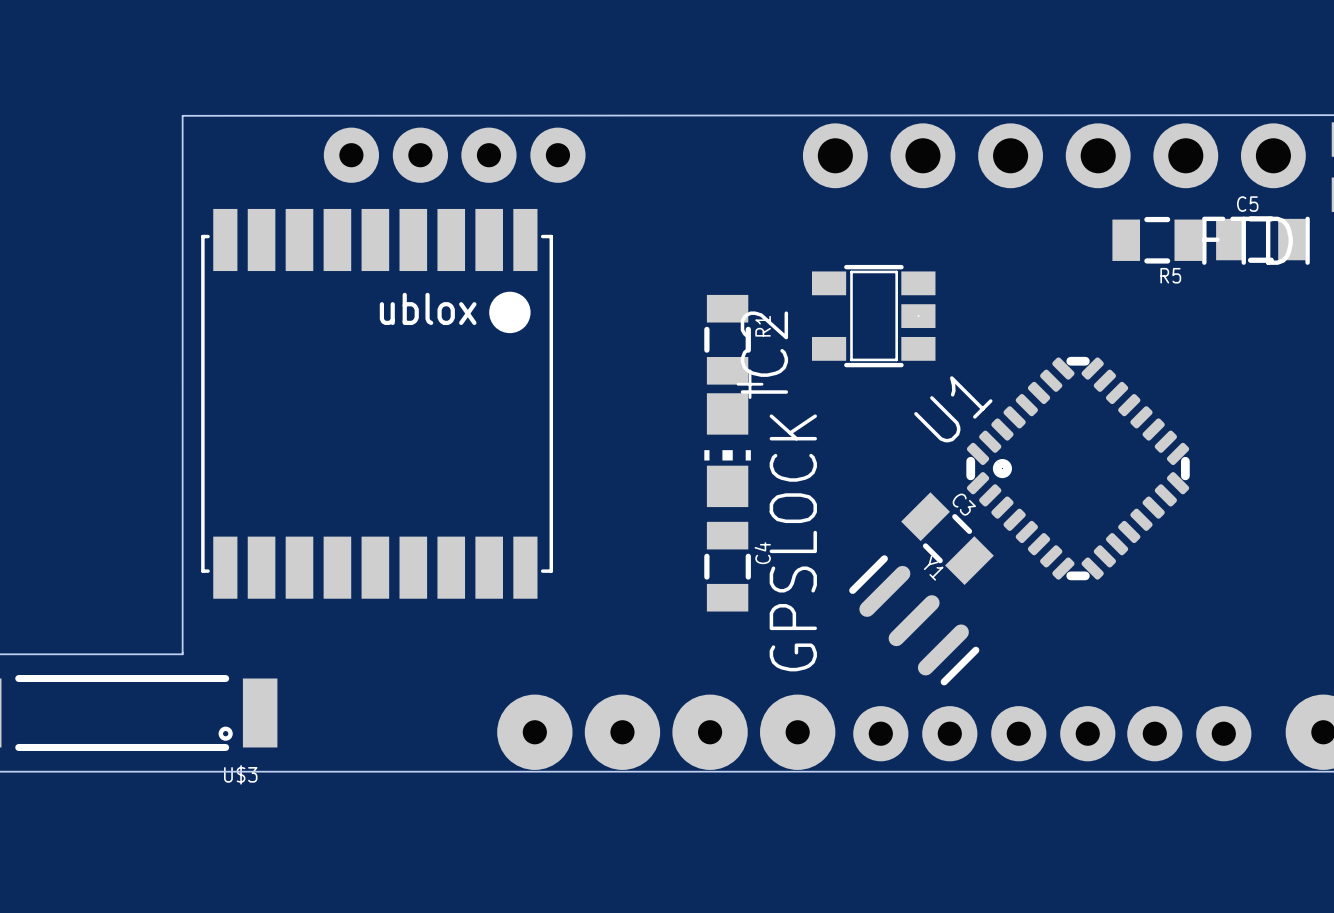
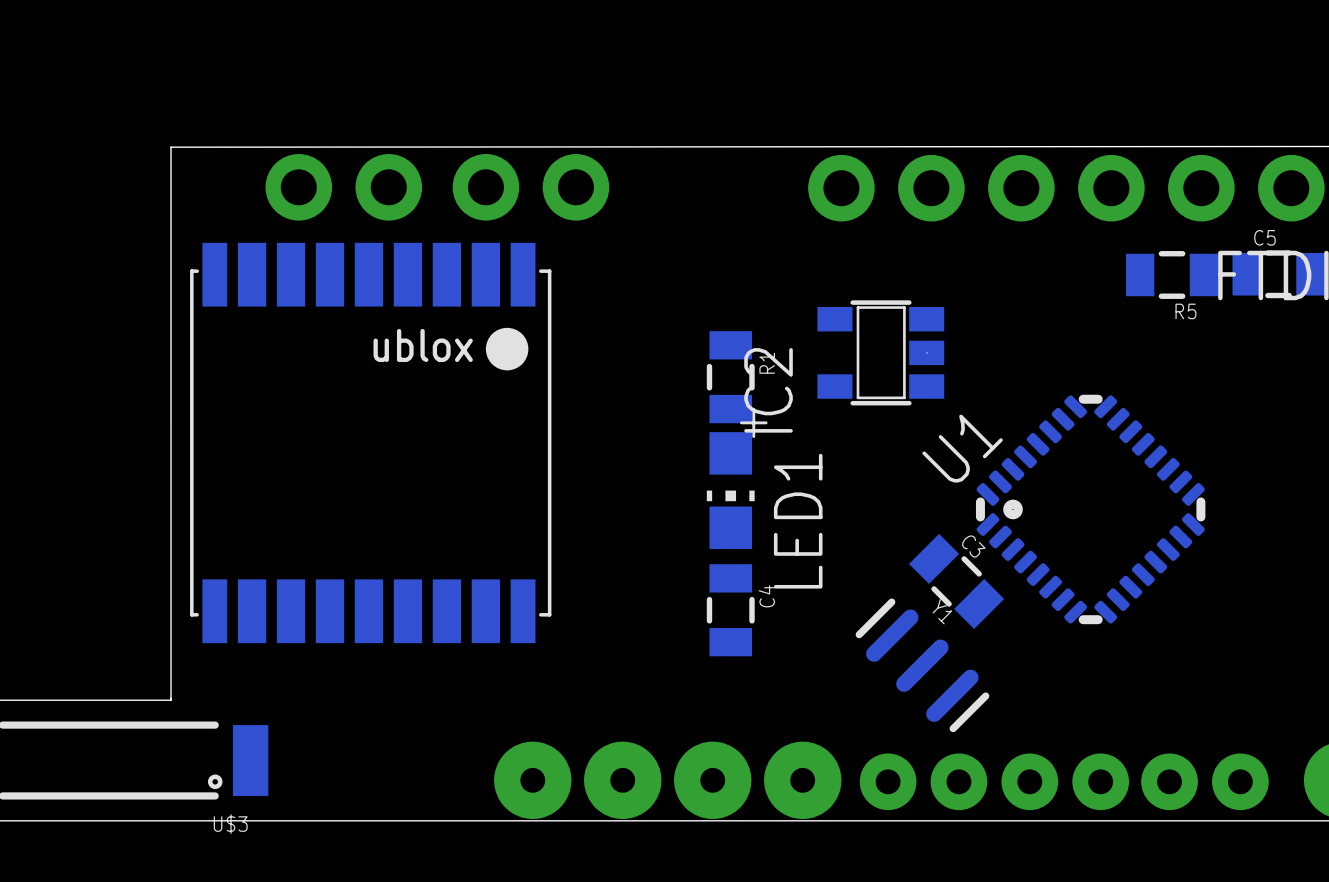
part footprint: [461, 127, 586, 183] -> [452, 154, 610, 221]
part: none -> (343, 187)
part: (385, 155) -> none
GPSLOCK name: GPSLOCK (793, 542) -> LED1 (798, 521)

